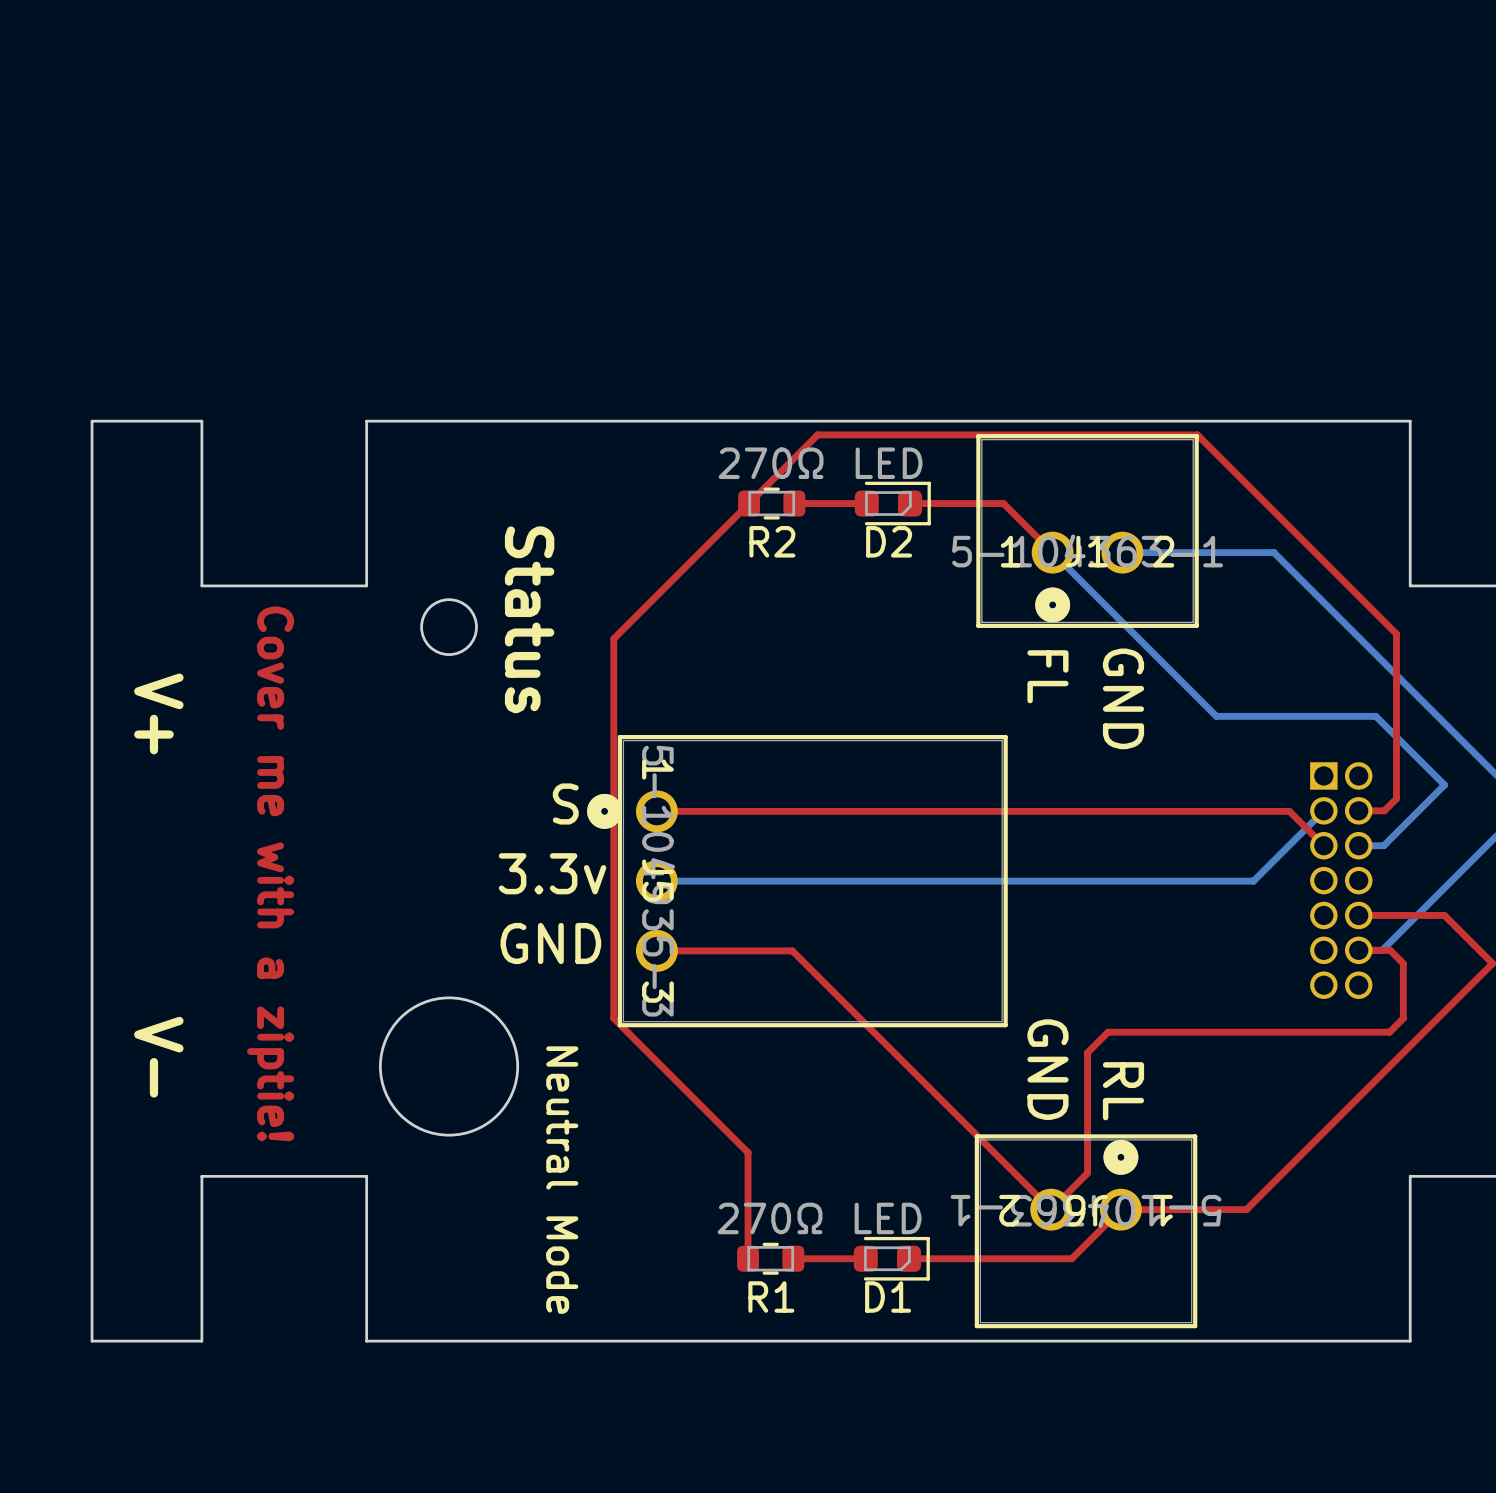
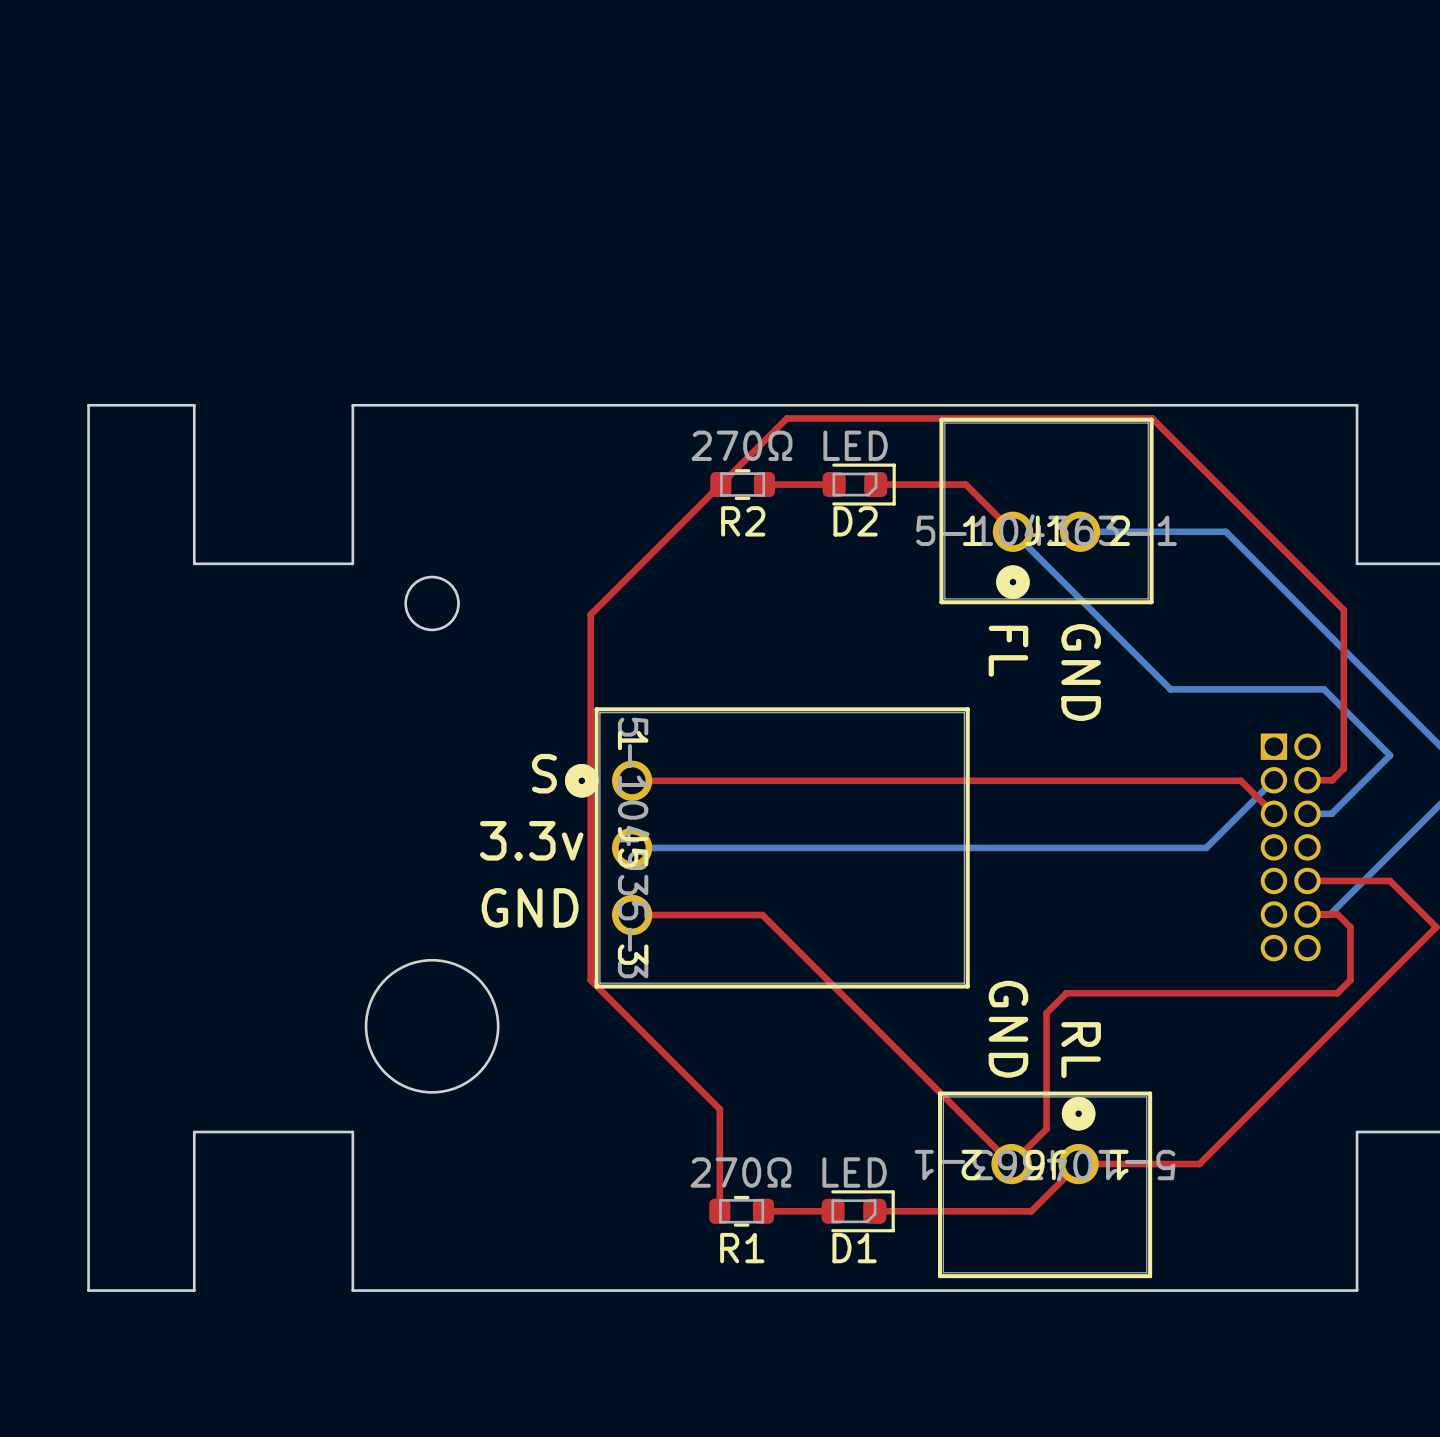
text: Status (529, 619) -> none
text: V+ (158, 713) -> none
text: Cover me with a ziptie! (270, 873) -> none
text: V- (158, 1057) -> none
text: Neutral Mode (562, 1180) -> none

